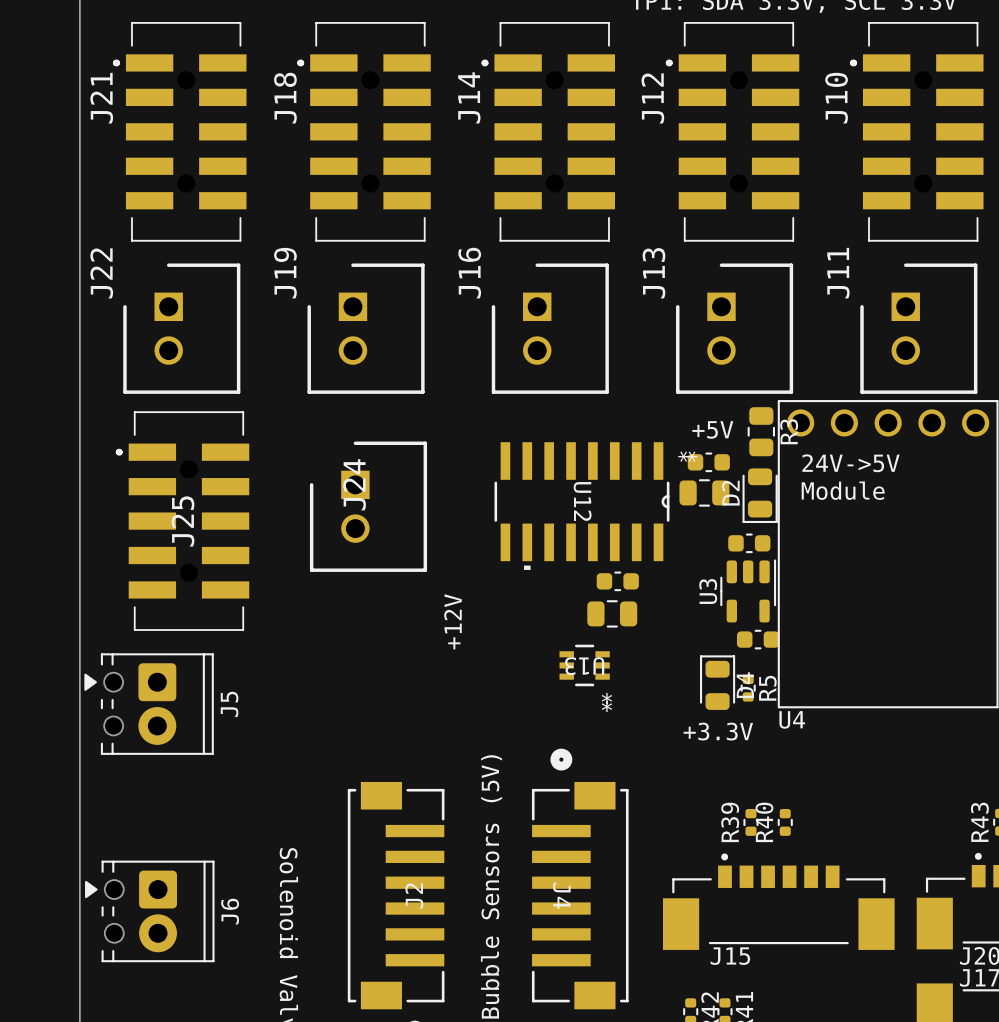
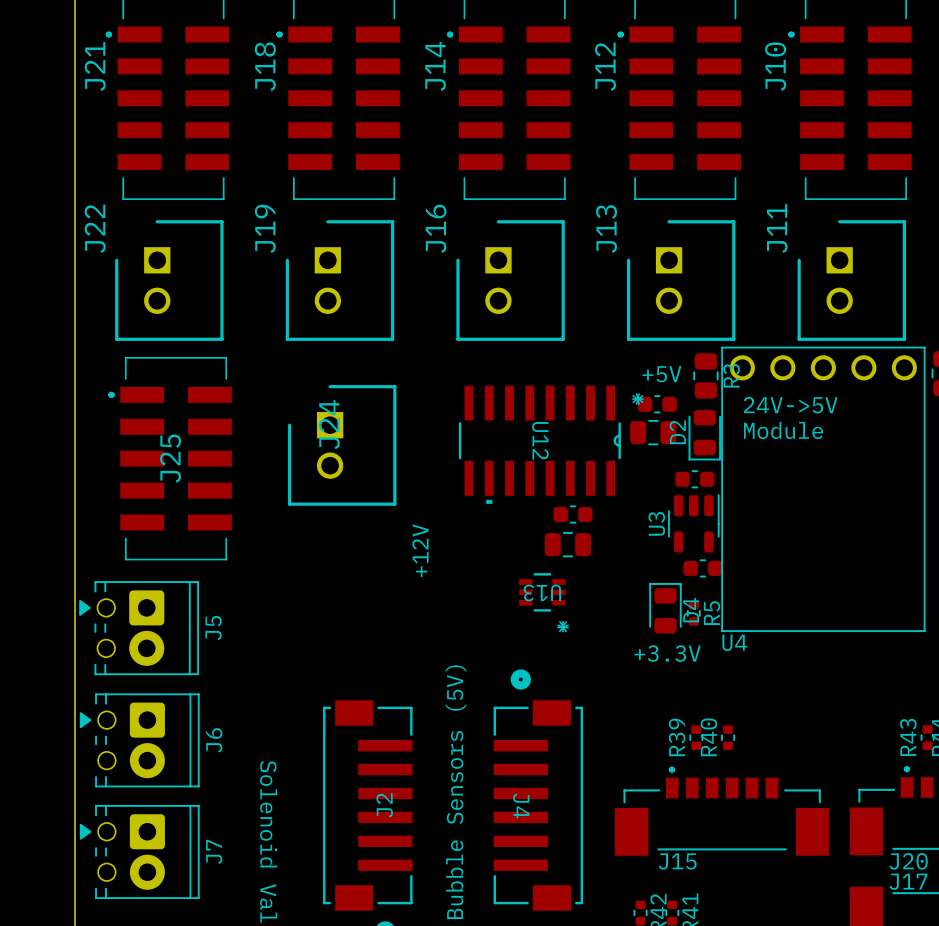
J6 position: (149, 911) -> (139, 740)
J7: none -> (139, 851)

